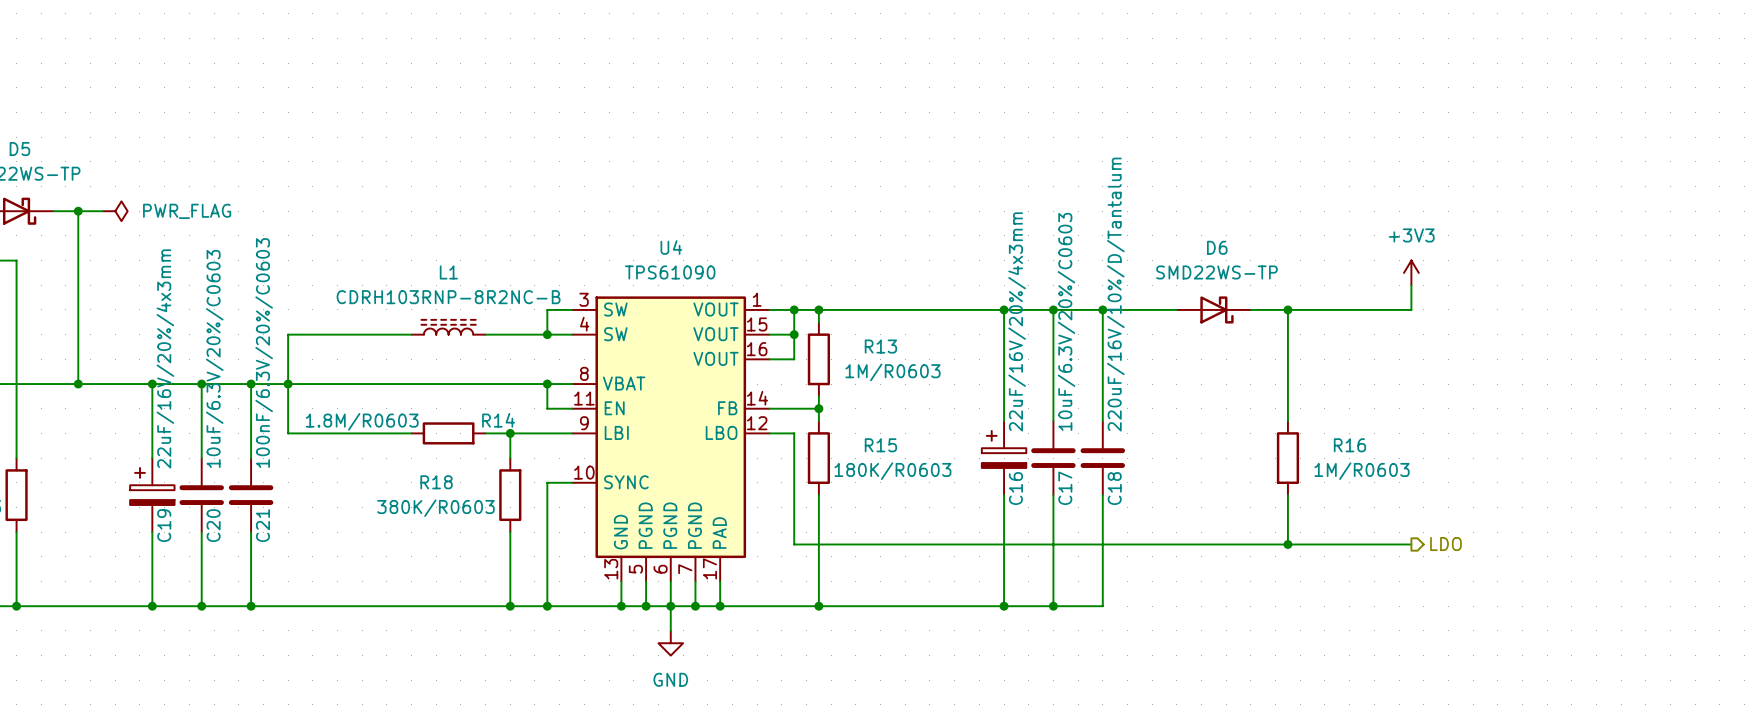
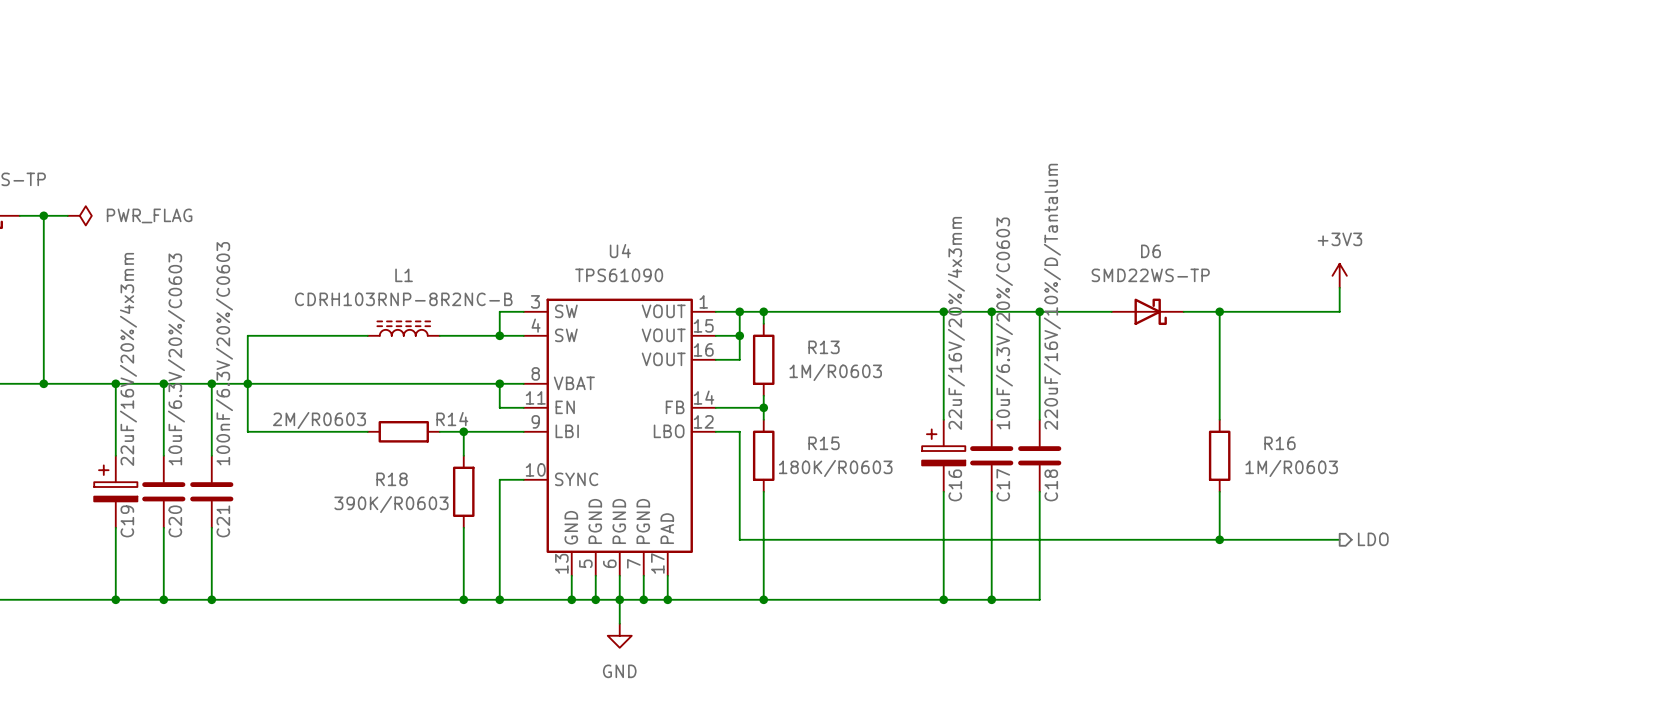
R14 value: 1.8M/R0603 (362, 421) -> 2M/R0603 (319, 420)
R18 value: 380K/R0603 (435, 508) -> 390K/R0603 (391, 504)

